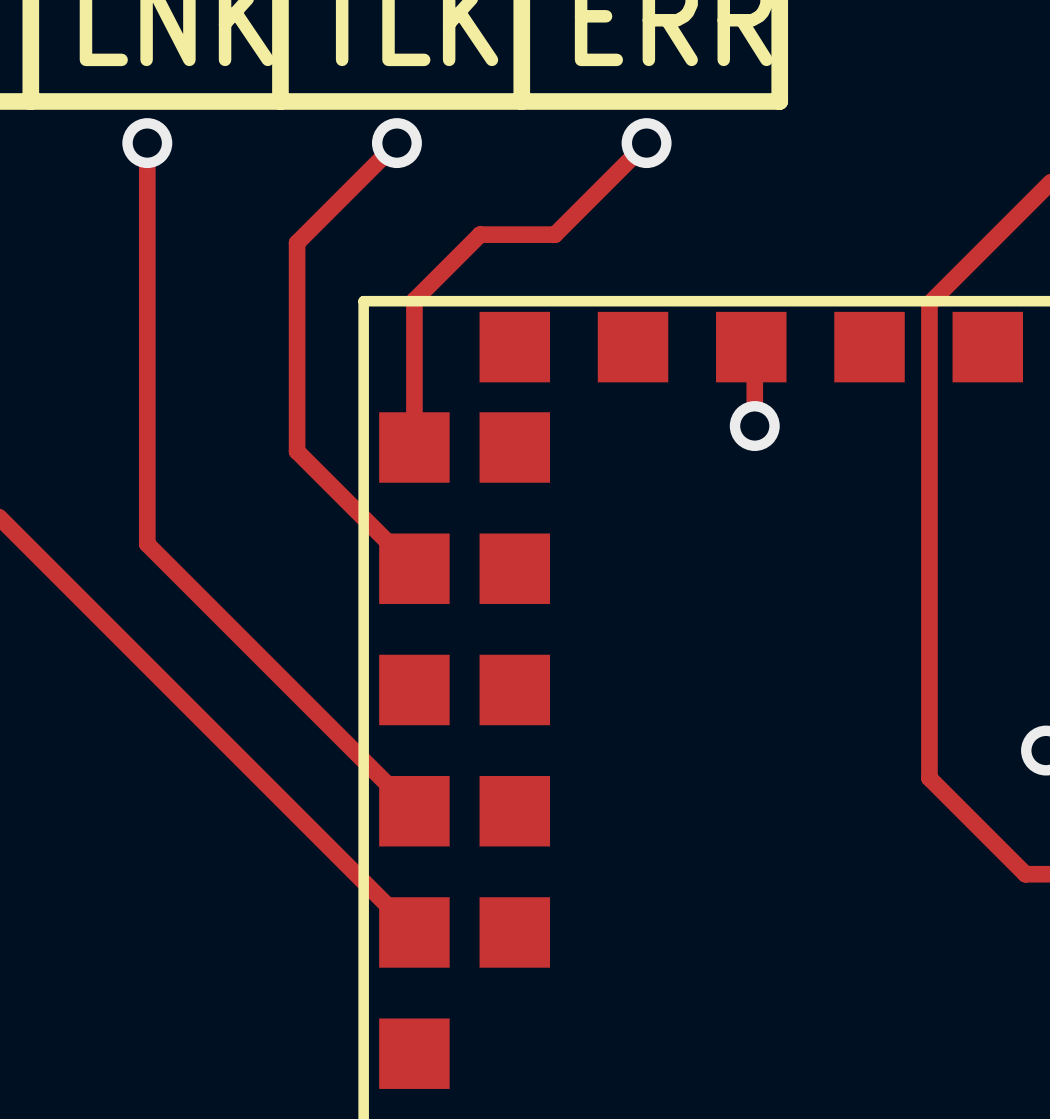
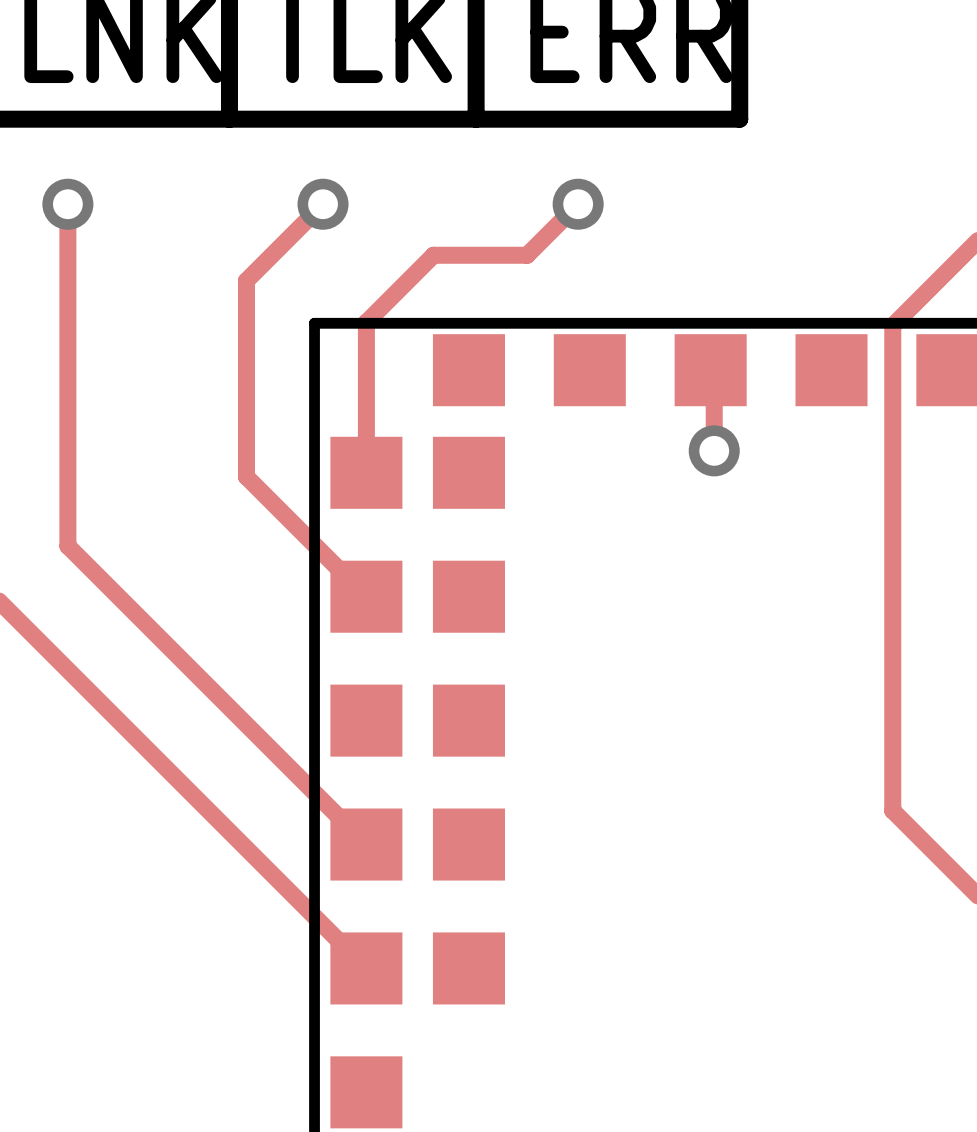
track: (147, 143) (147, 544) -> (67, 204) (67, 546) (93, 571)
via position: (147, 143) -> (67, 204)
track: (396, 143) (297, 242) (297, 259) -> (323, 204) (246, 280)
via position: (396, 143) -> (323, 204)
track: (646, 143) (555, 234) -> (578, 204) (527, 255) (510, 255)
via position: (646, 143) -> (578, 204)

